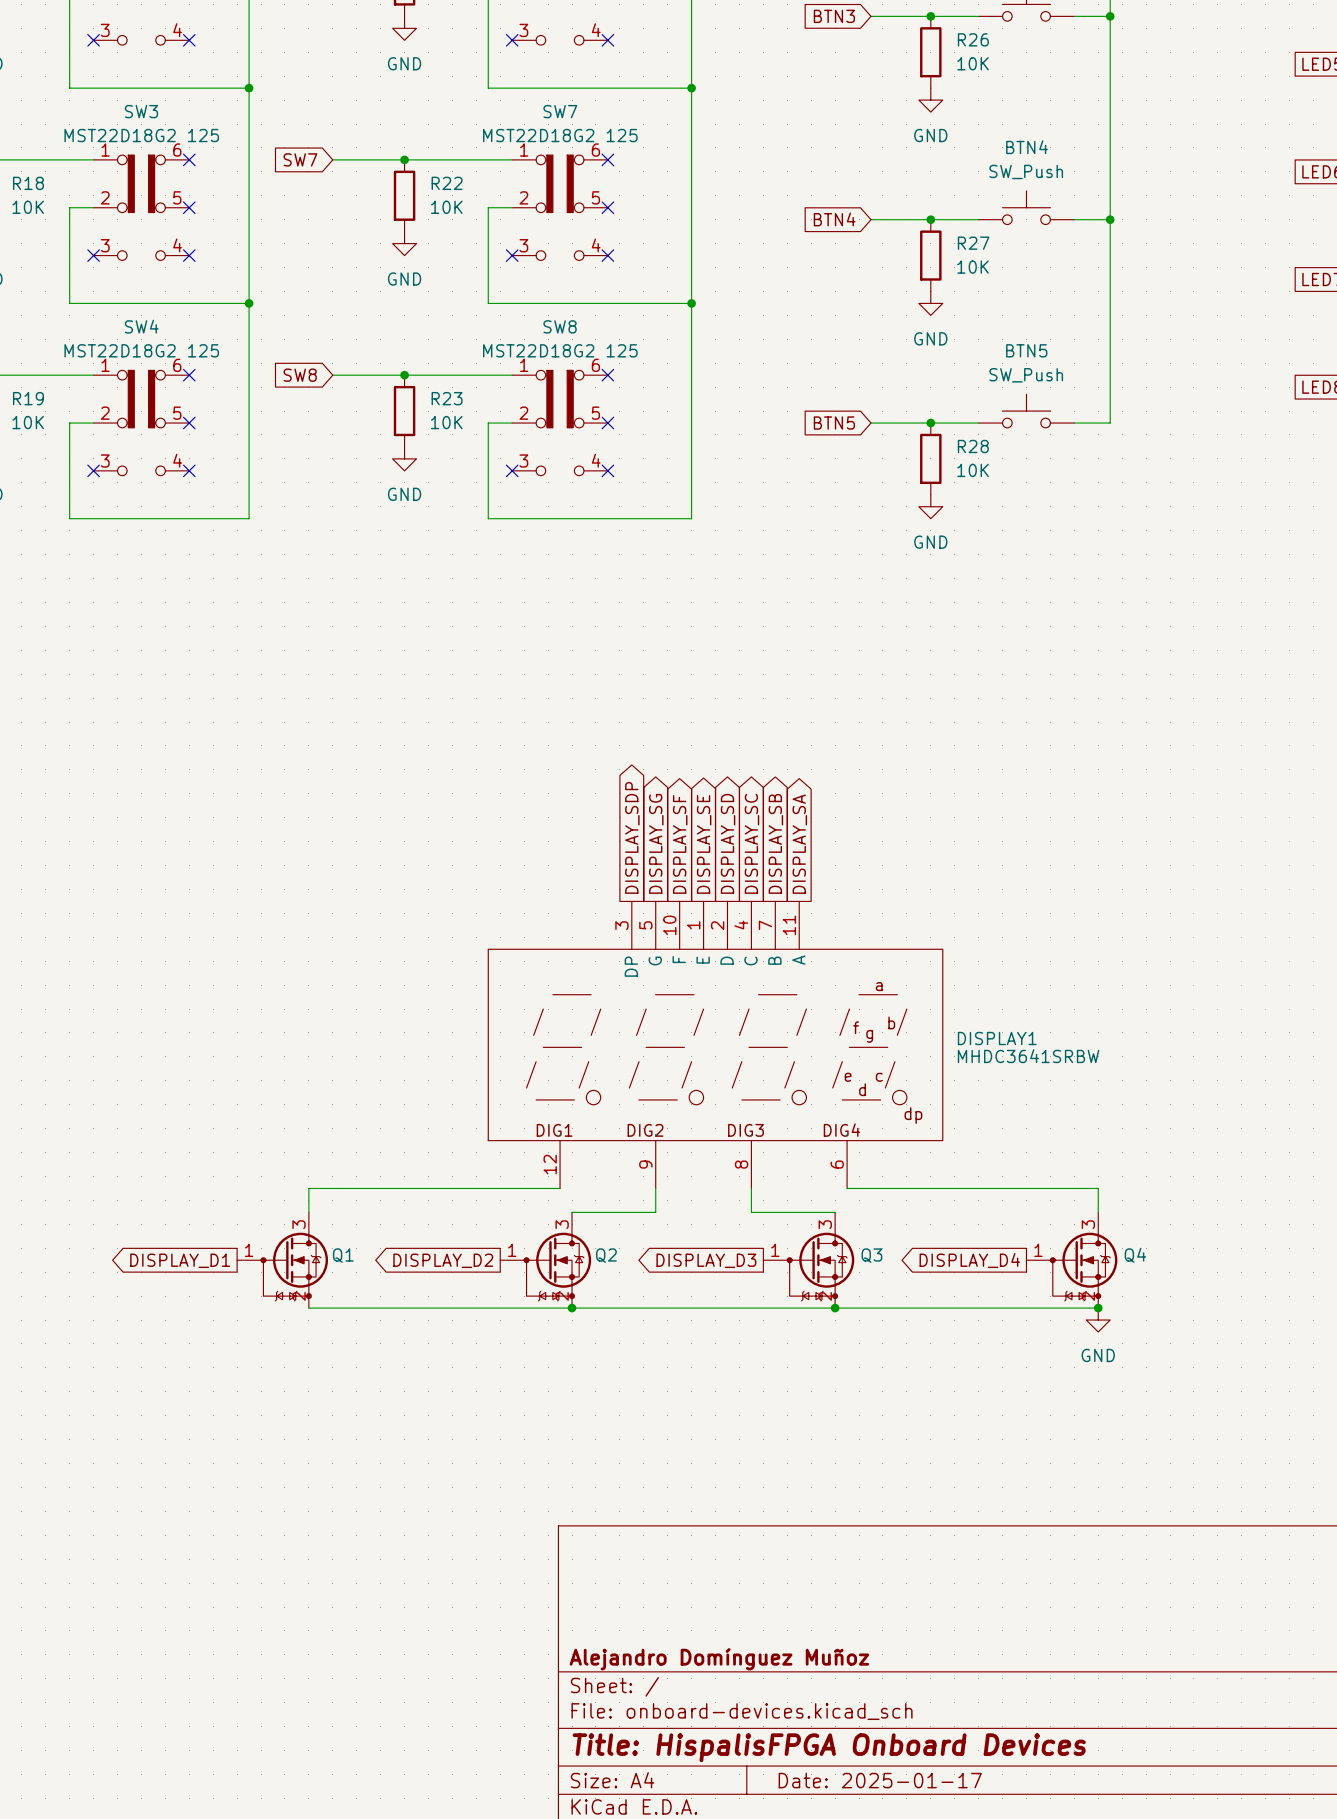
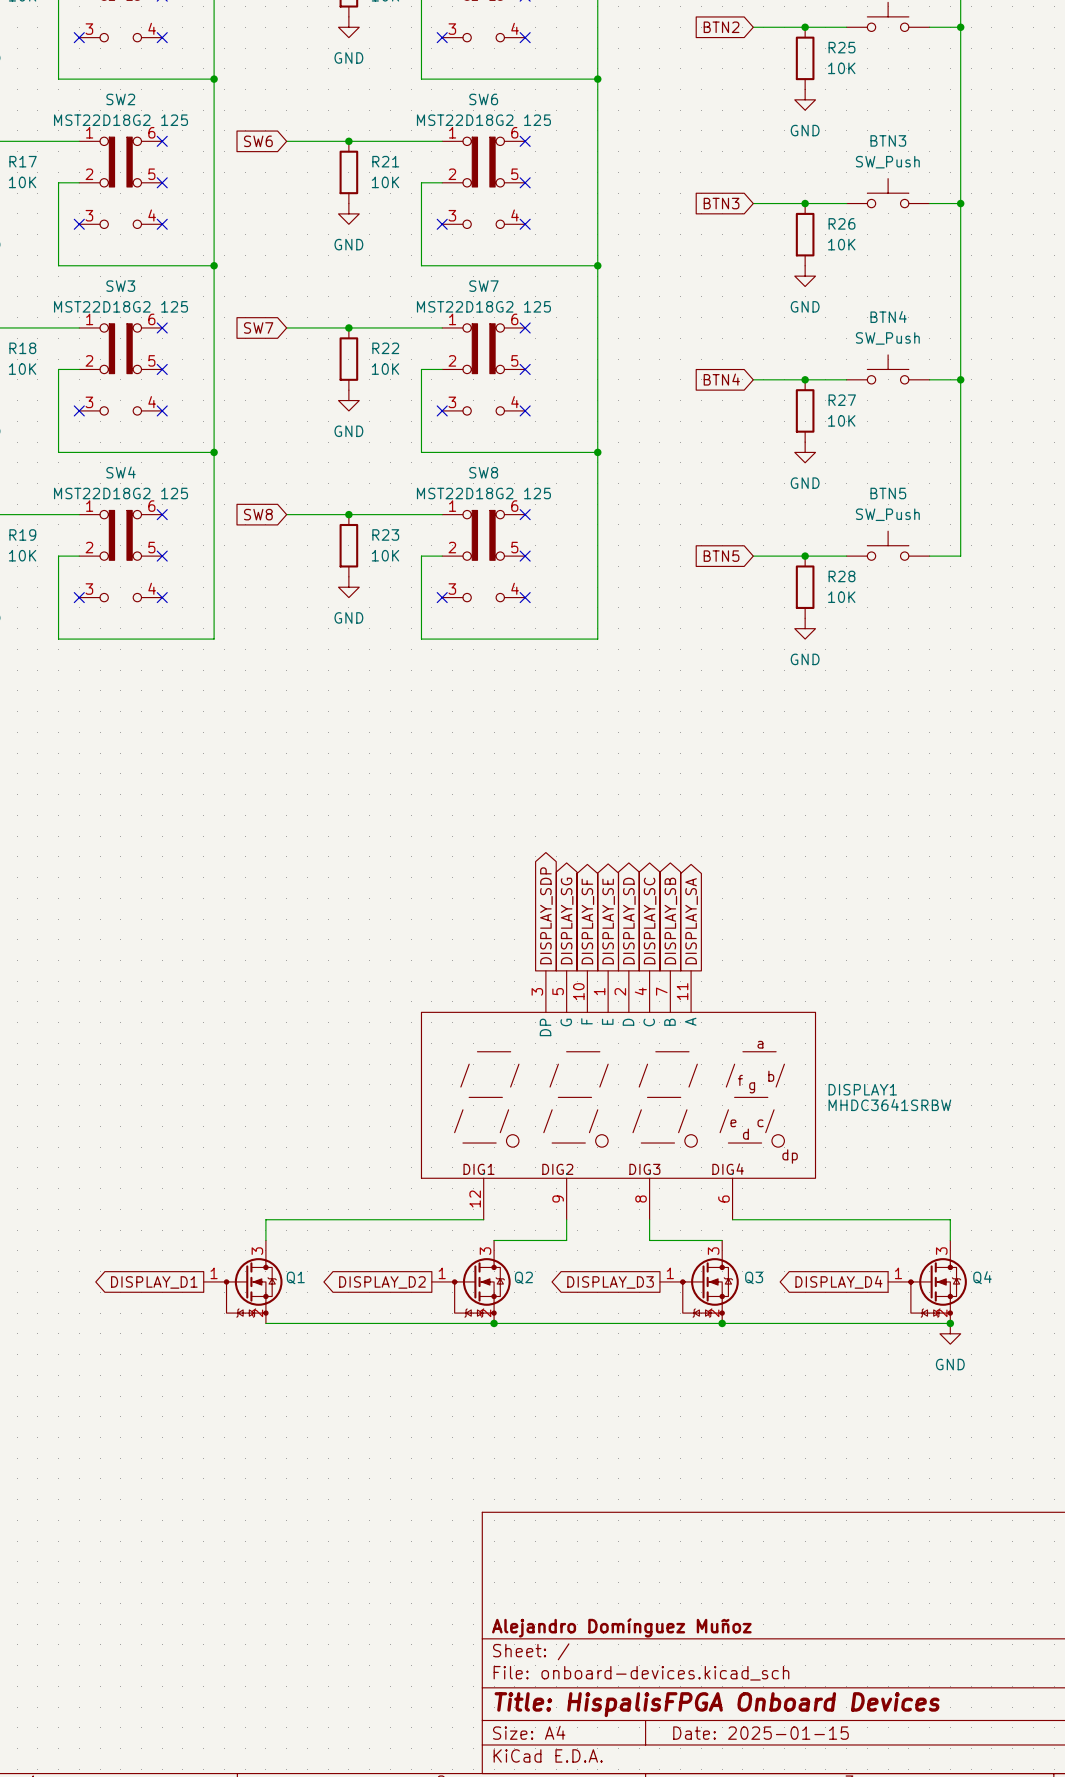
title block: Date: 2025-01-17 (880, 1780) -> Date: 2025-01-15 (761, 1733)

